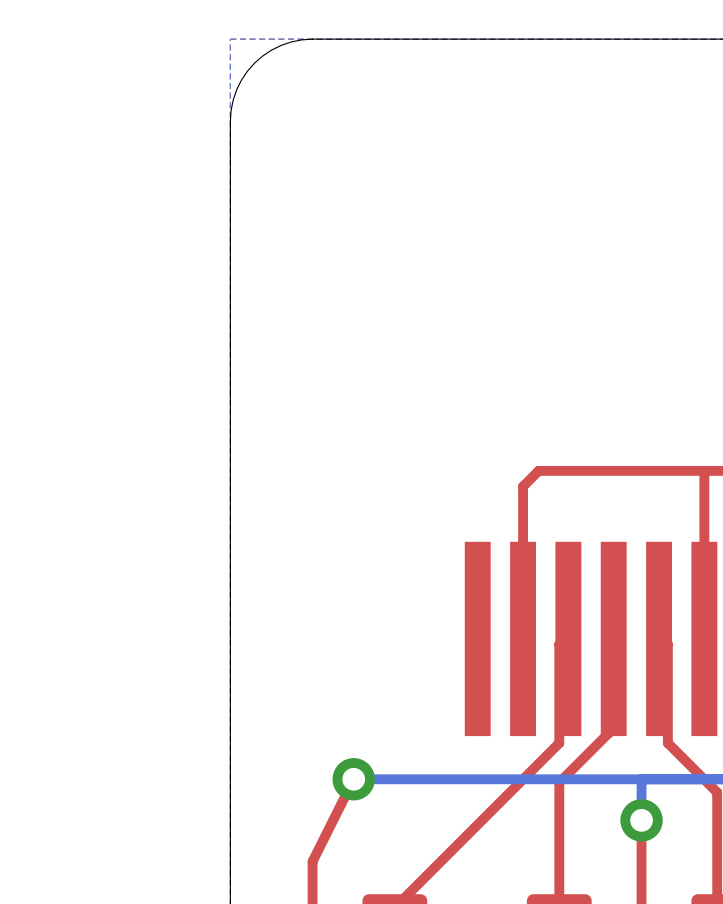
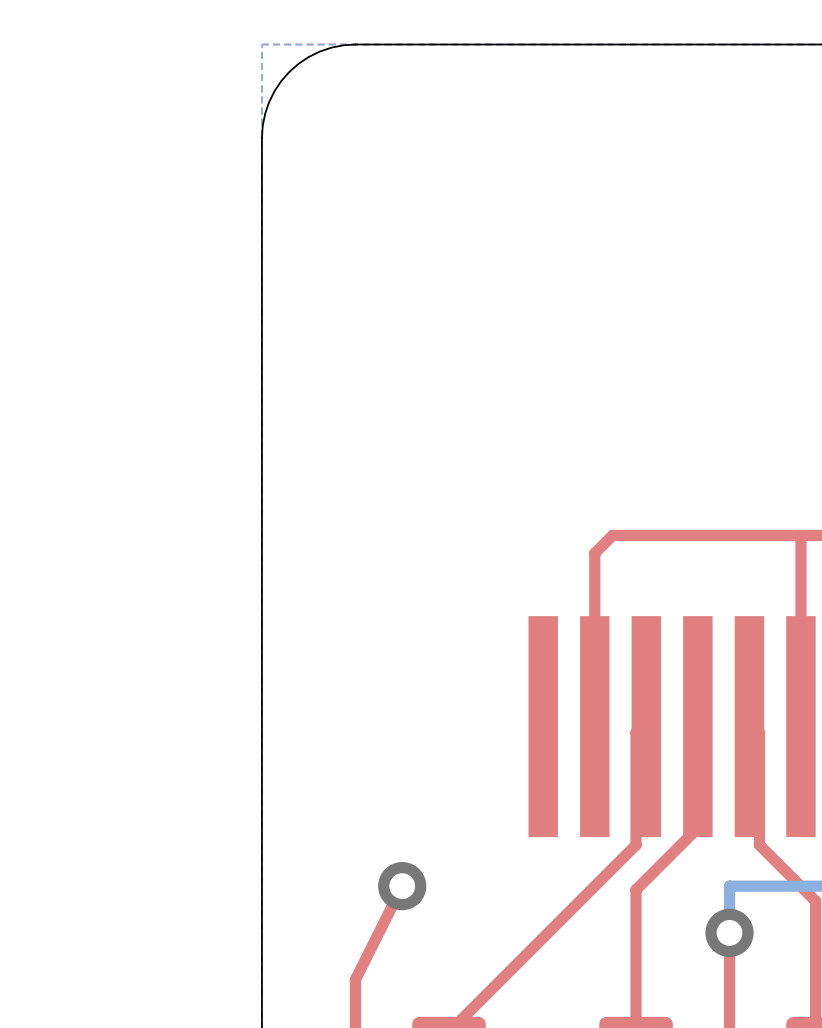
bottom track: (641, 779) (353, 779) -> none

